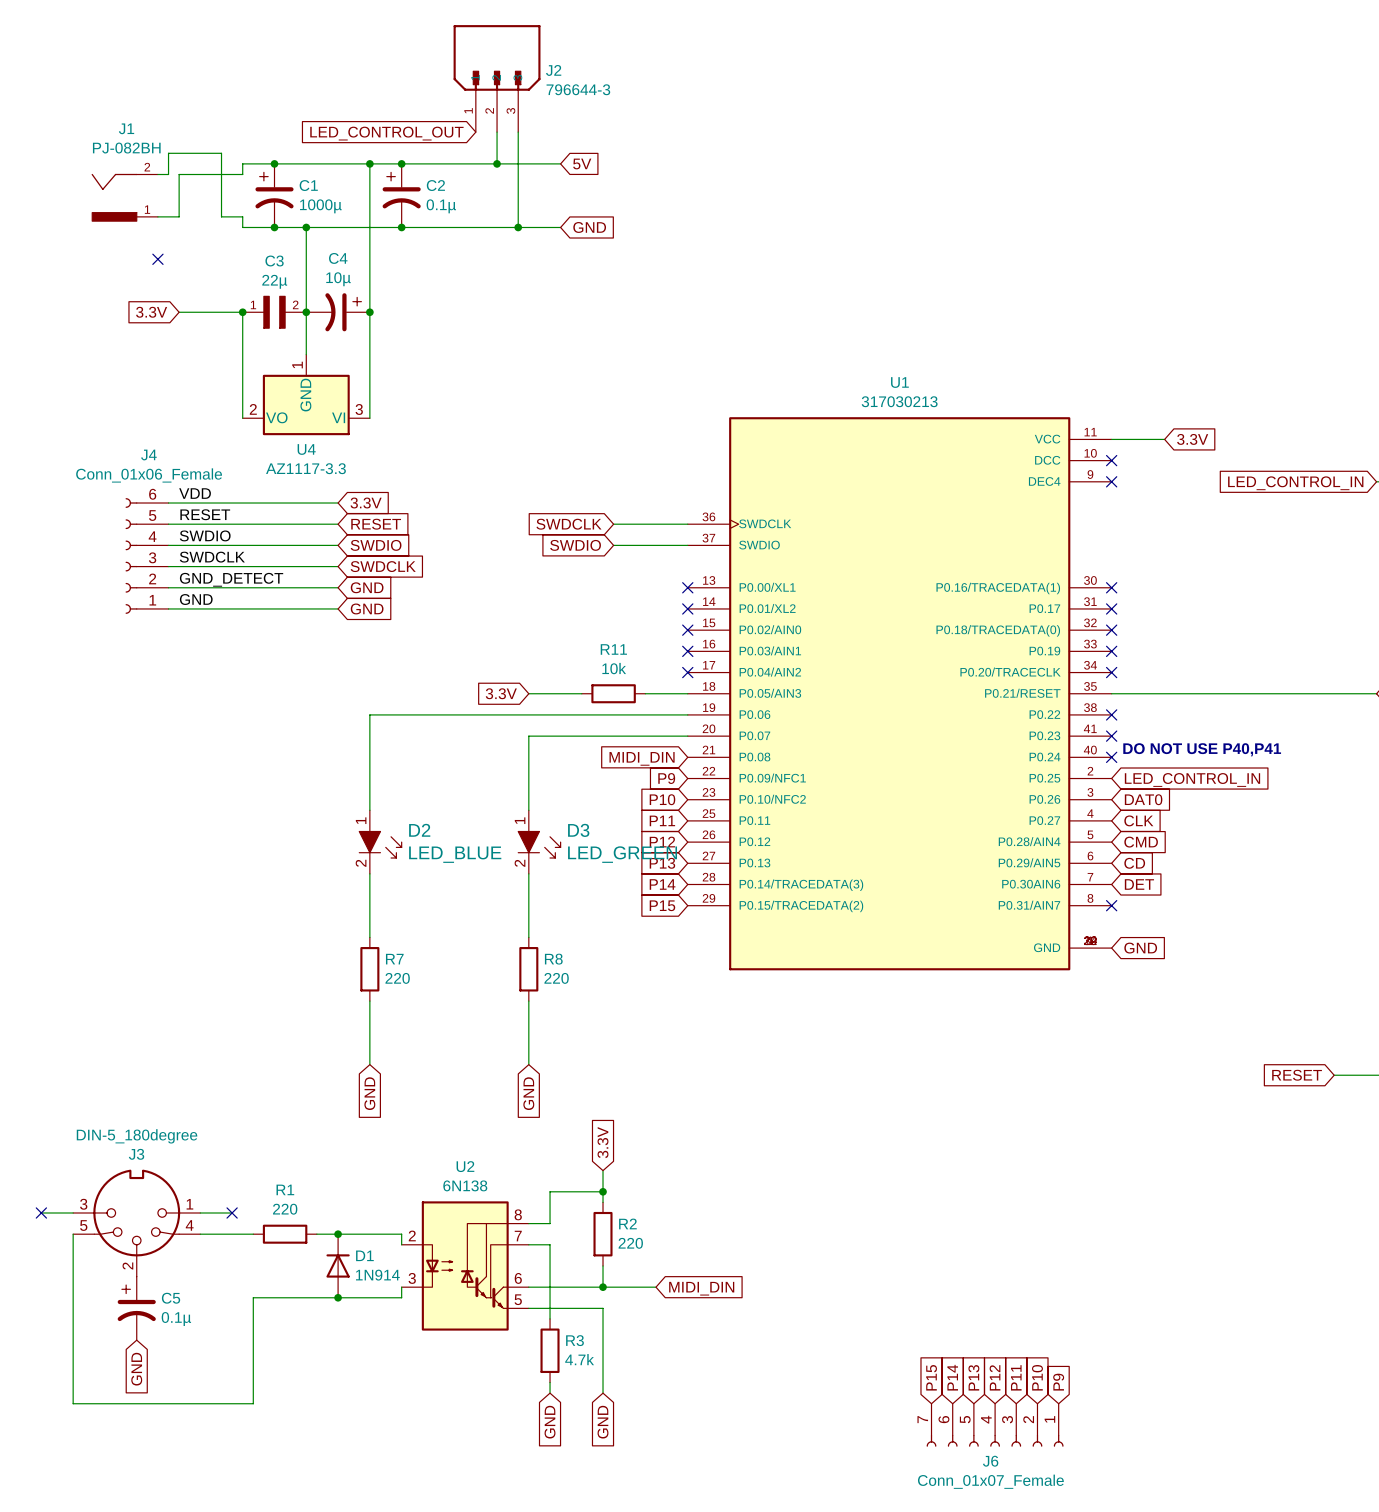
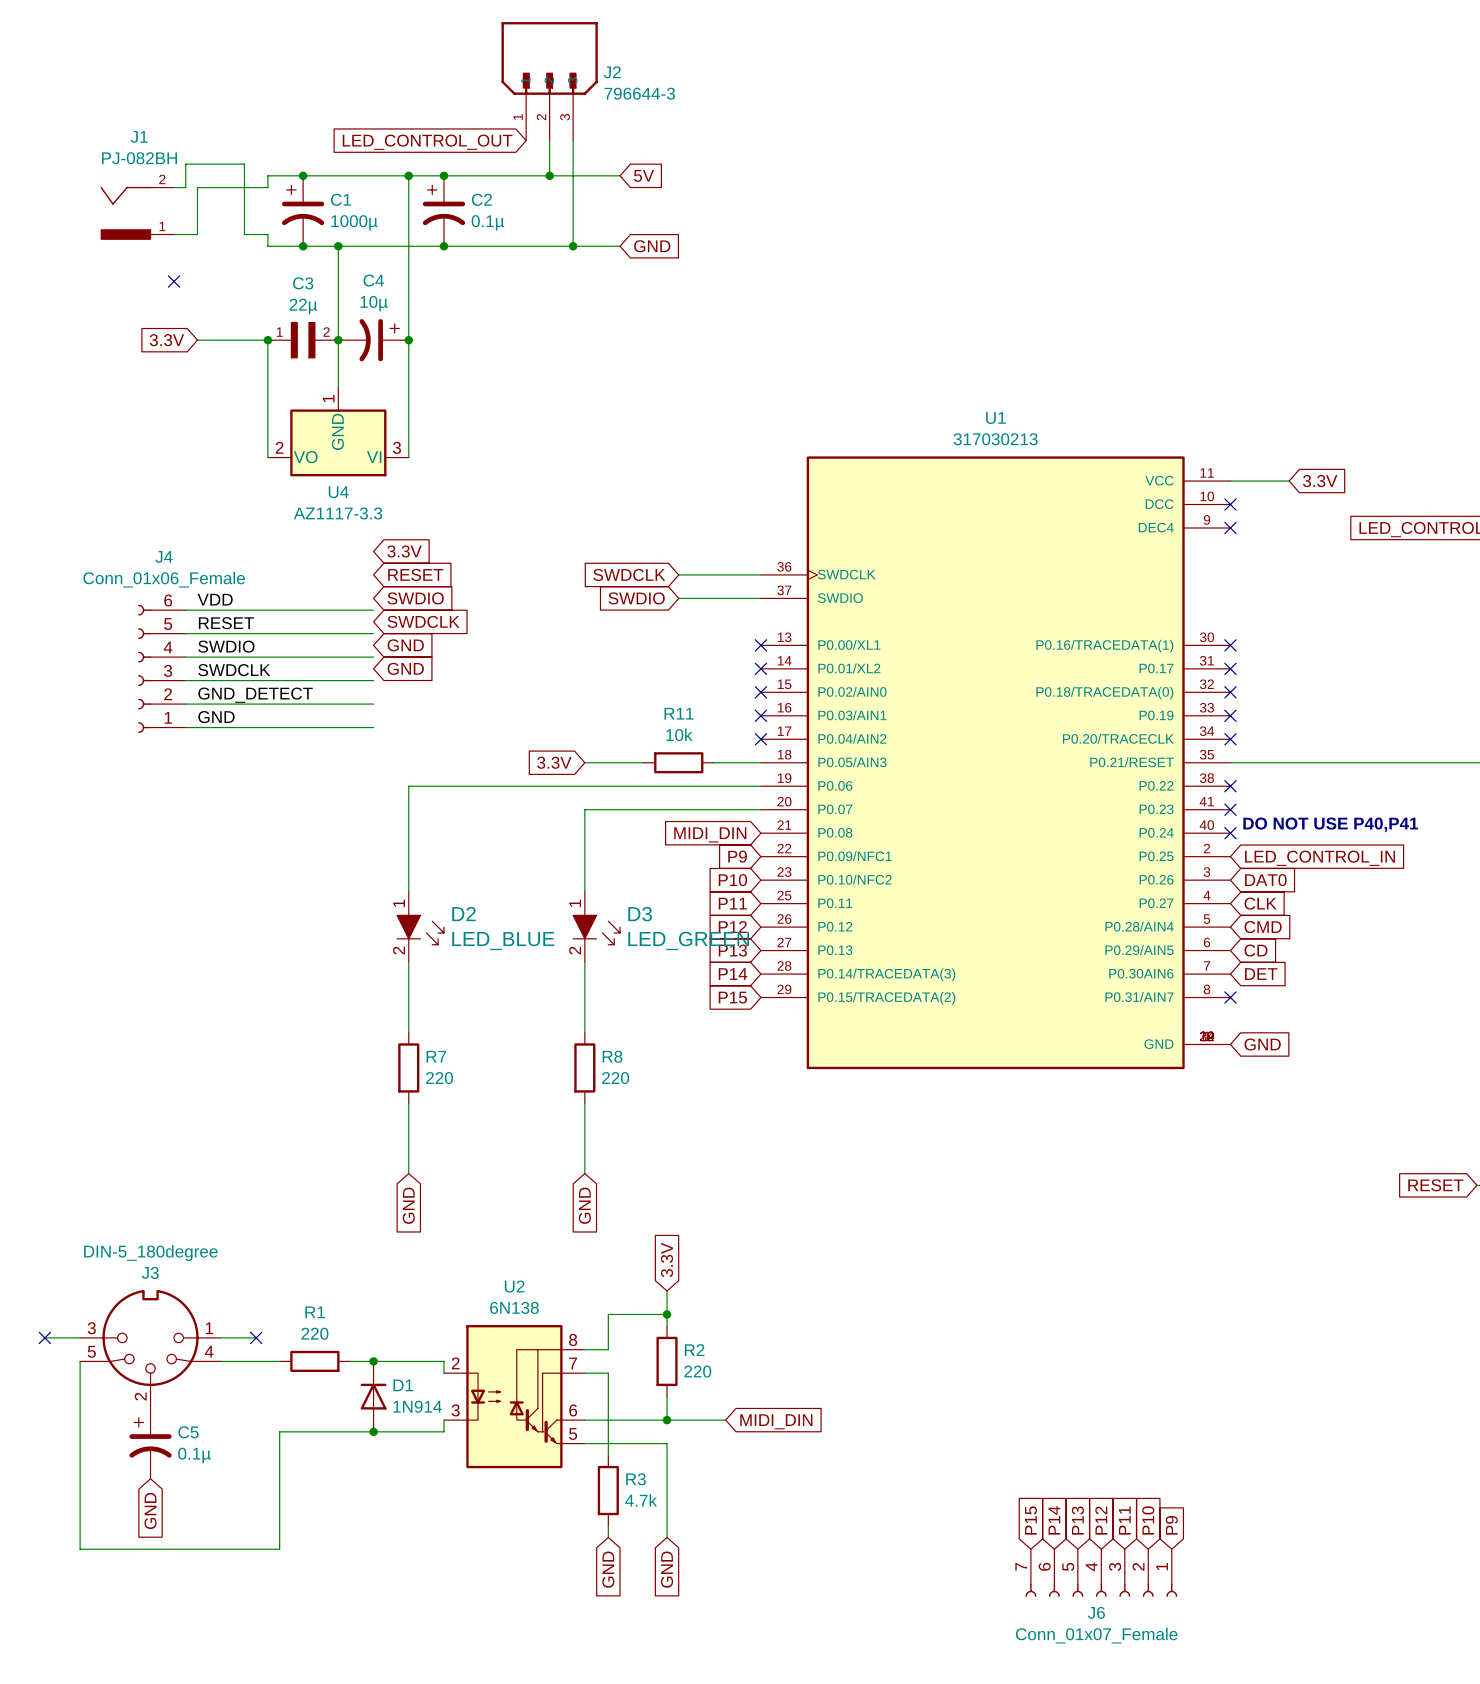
label position: VDD (195, 493) -> VDD (215, 599)
wire: (168, 503) (338, 503) -> (185, 610) (373, 610)
label position: RESET (205, 514) -> RESET (226, 623)
wire: (168, 524) (338, 524) -> (185, 633) (373, 633)
label position: SWDIO (205, 535) -> SWDIO (226, 646)
wire: (168, 545) (338, 545) -> (185, 657) (373, 657)
J4 position: (147, 555) -> (161, 668)
label position: SWDCLK (212, 557) -> SWDCLK (234, 670)
wire: (168, 566) (338, 566) -> (185, 680) (373, 680)
label position: GND_DETECT (231, 579) -> GND_DETECT (255, 695)
wire: (168, 587) (338, 587) -> (185, 704) (373, 704)
label position: GND (196, 599) -> GND (216, 717)
wire: (168, 608) (338, 608) -> (185, 727) (373, 727)

